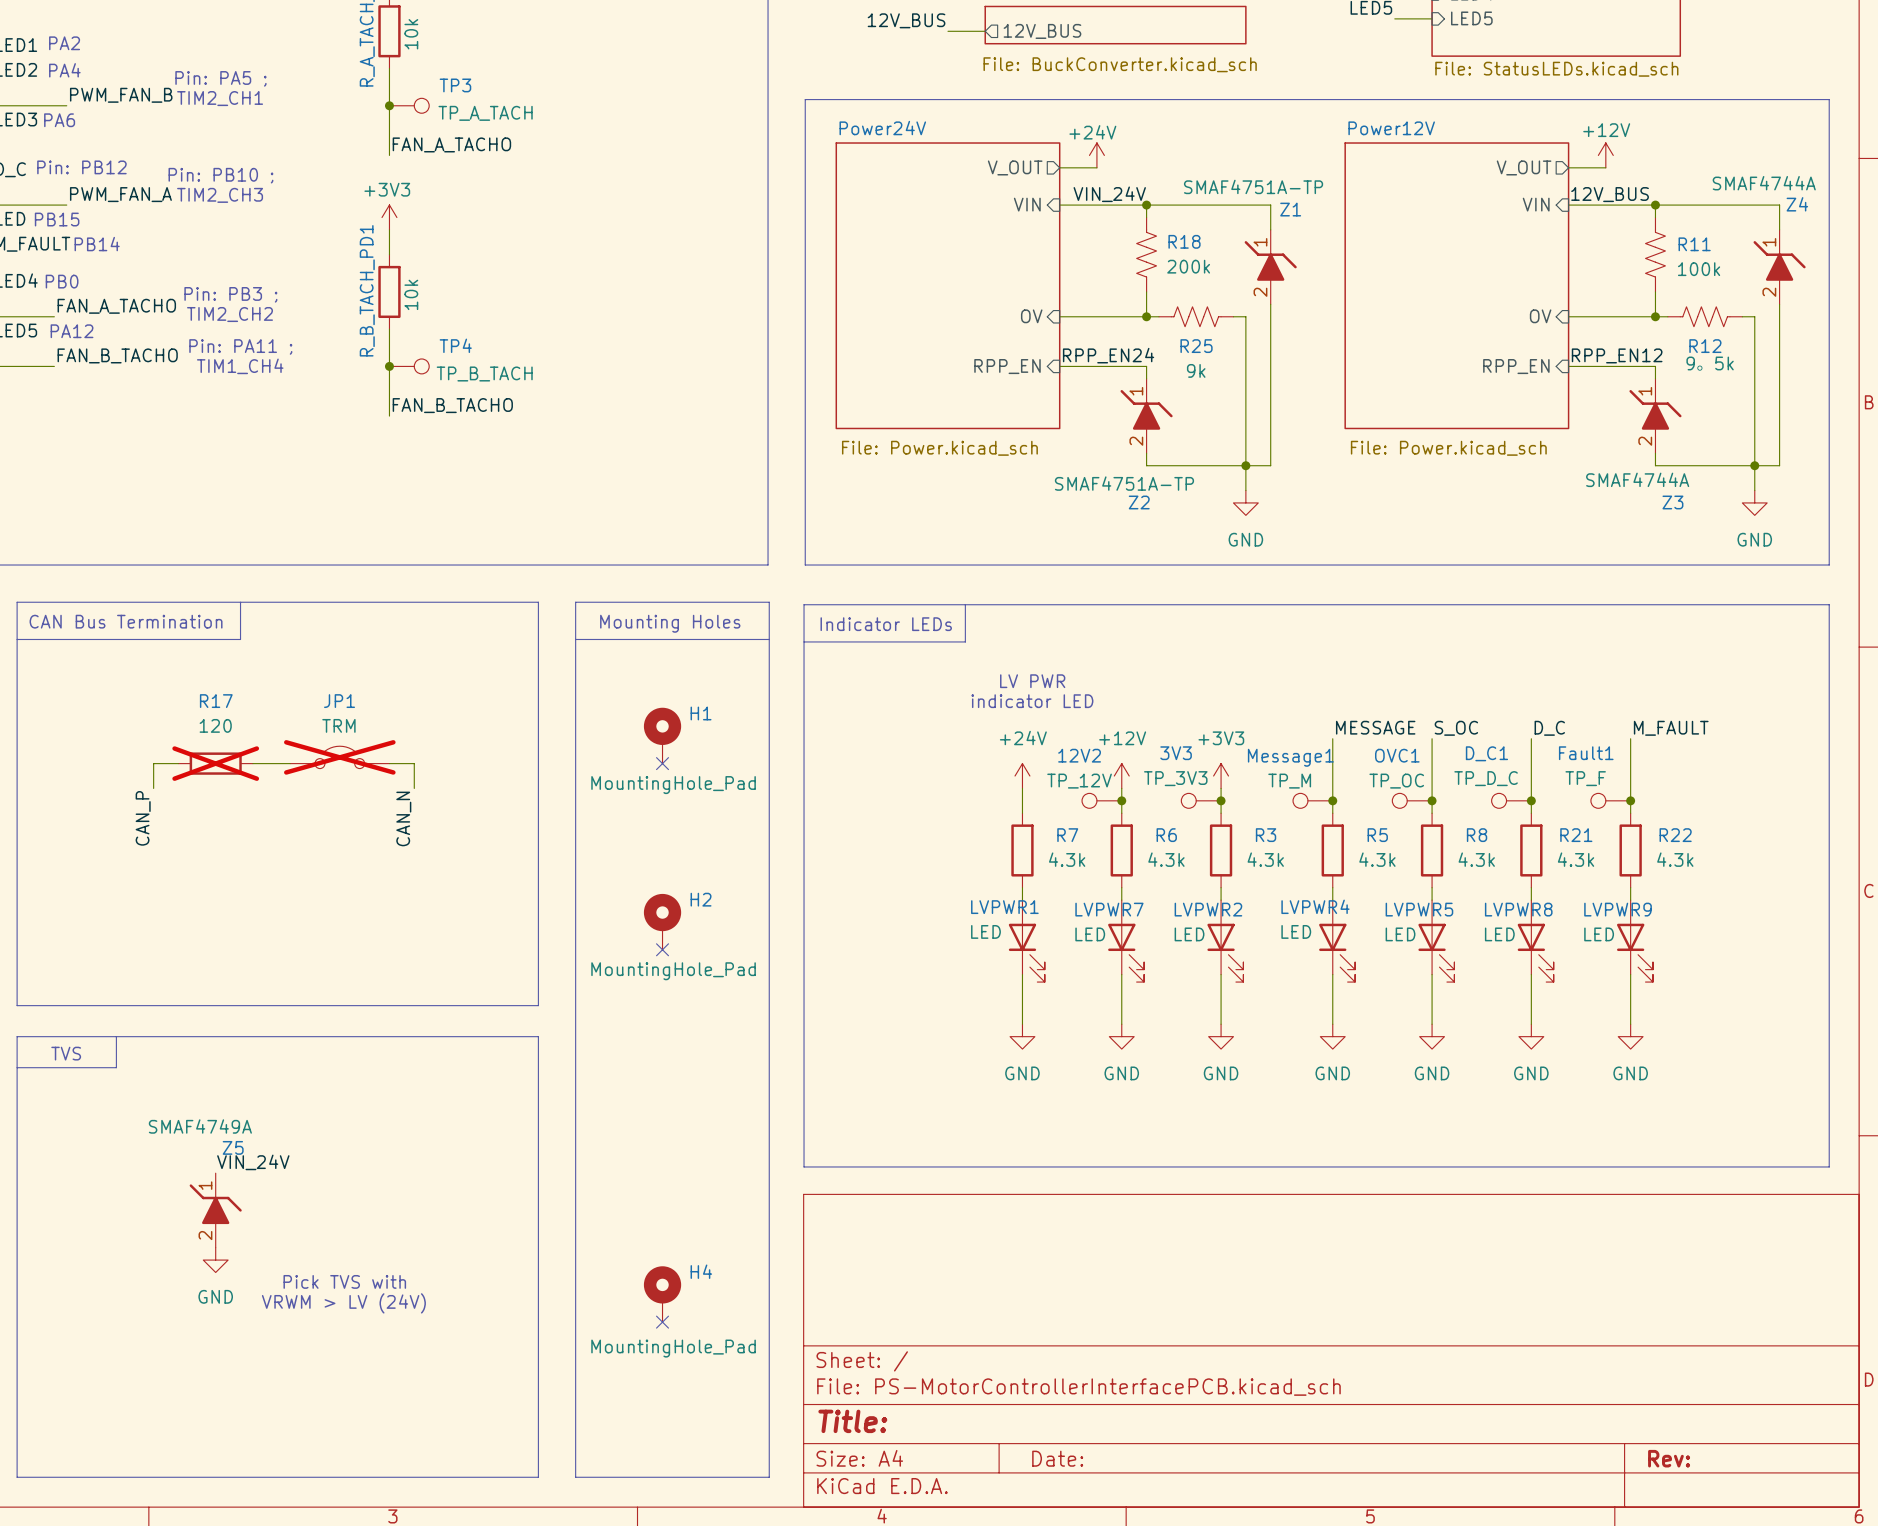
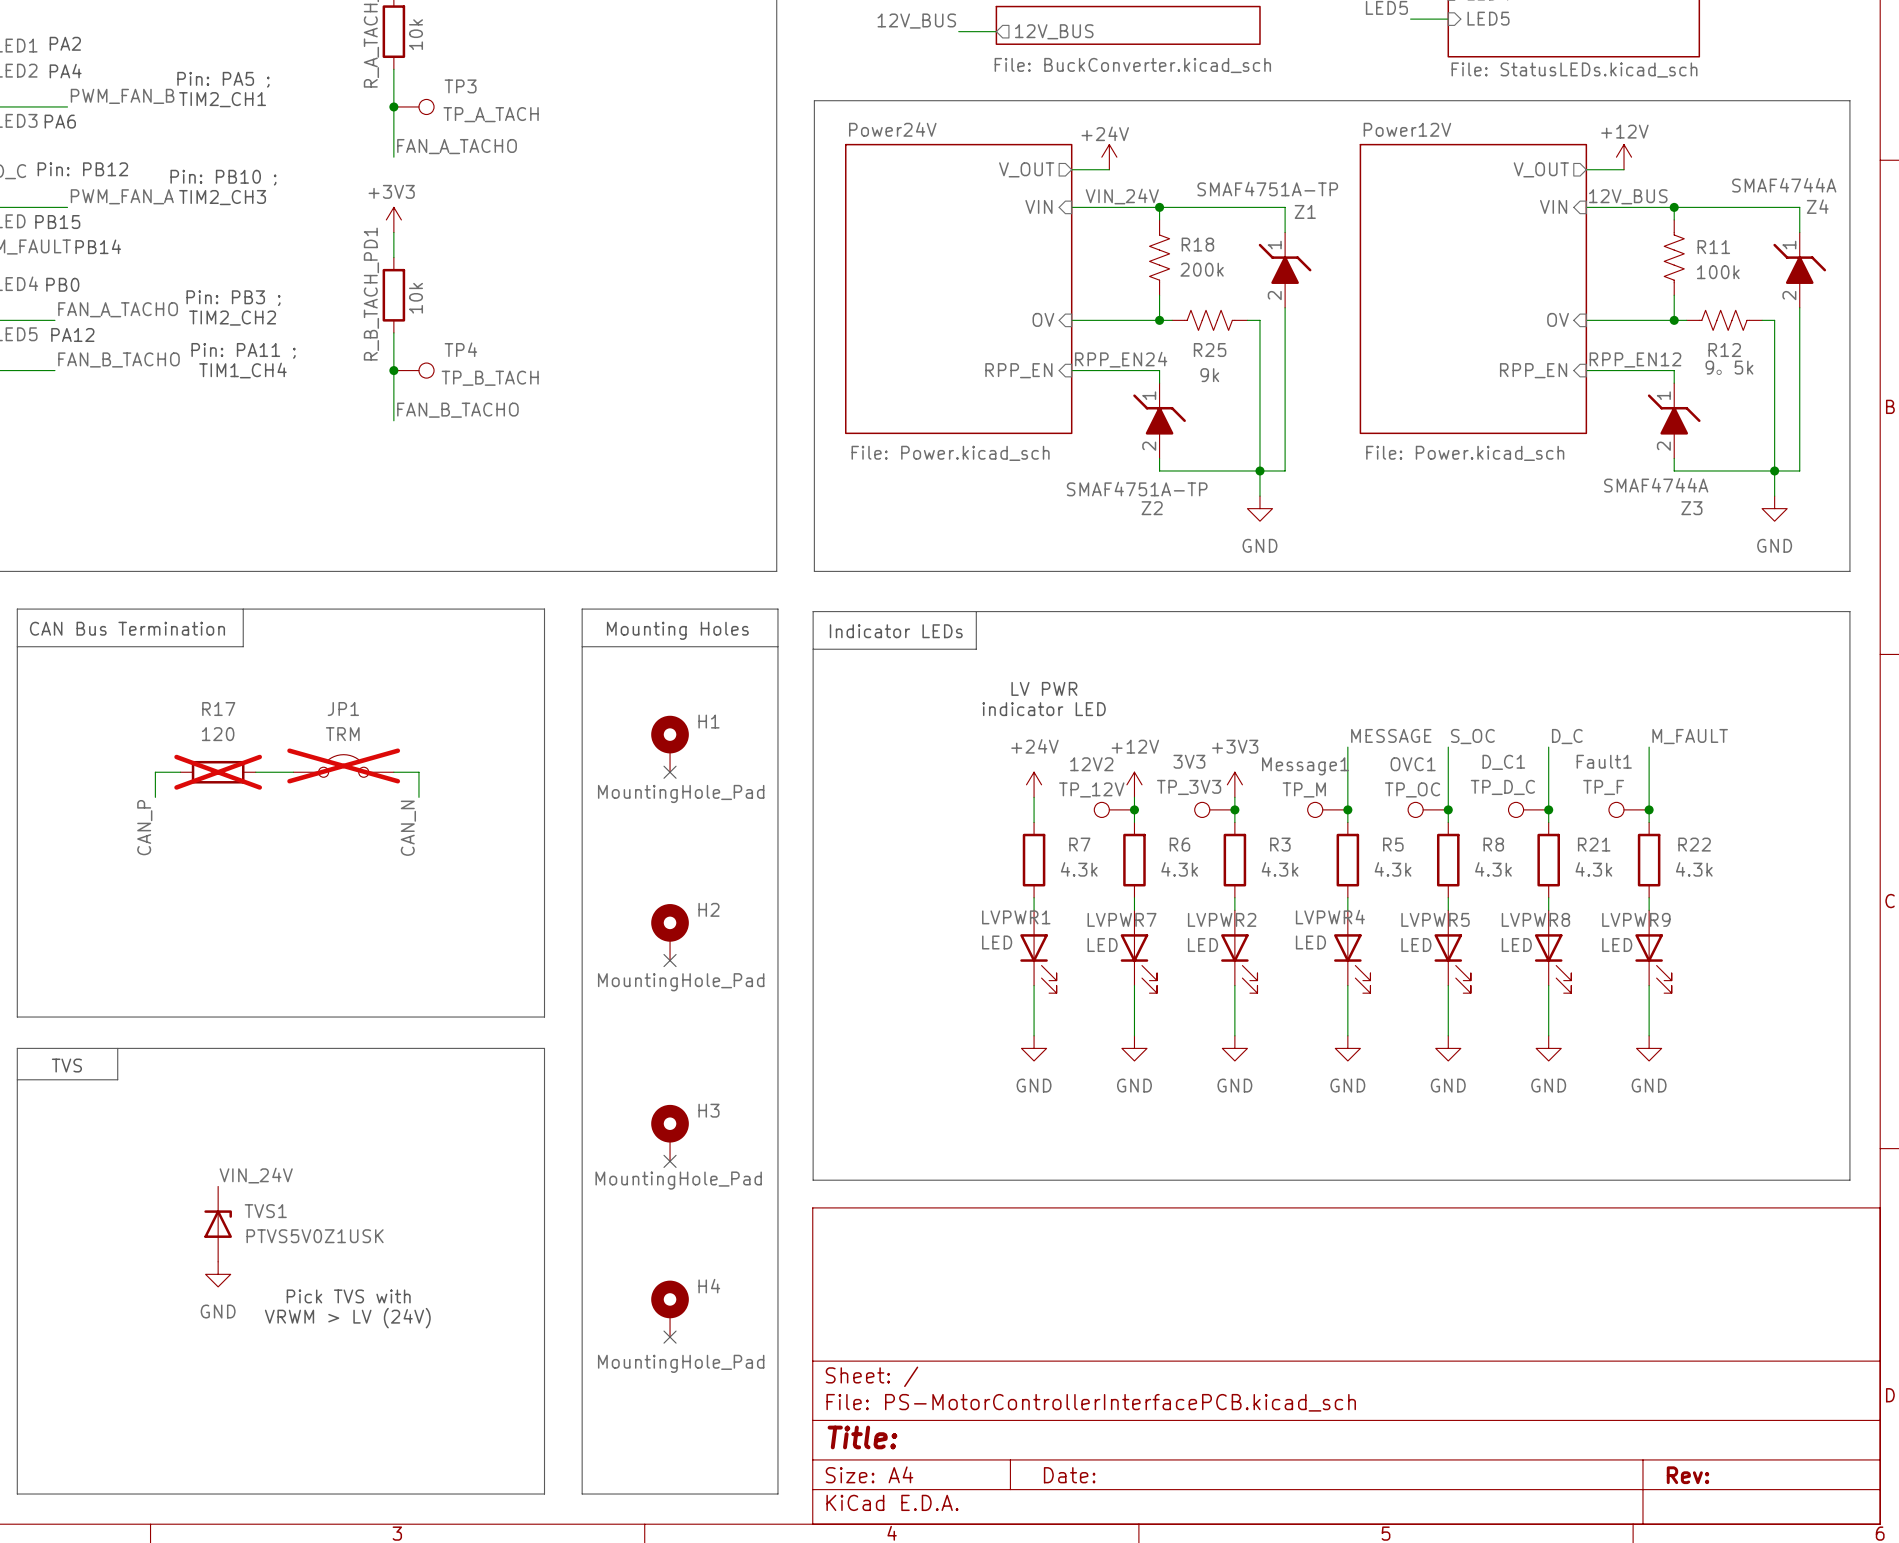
H3: none -> MountingHole_Pad (670, 1133)
no-connect mark: none -> (670, 1161)
Z5: SMAF4749A (215, 1210) -> none
TVS1: none -> PTVS5V0Z1USK (218, 1224)

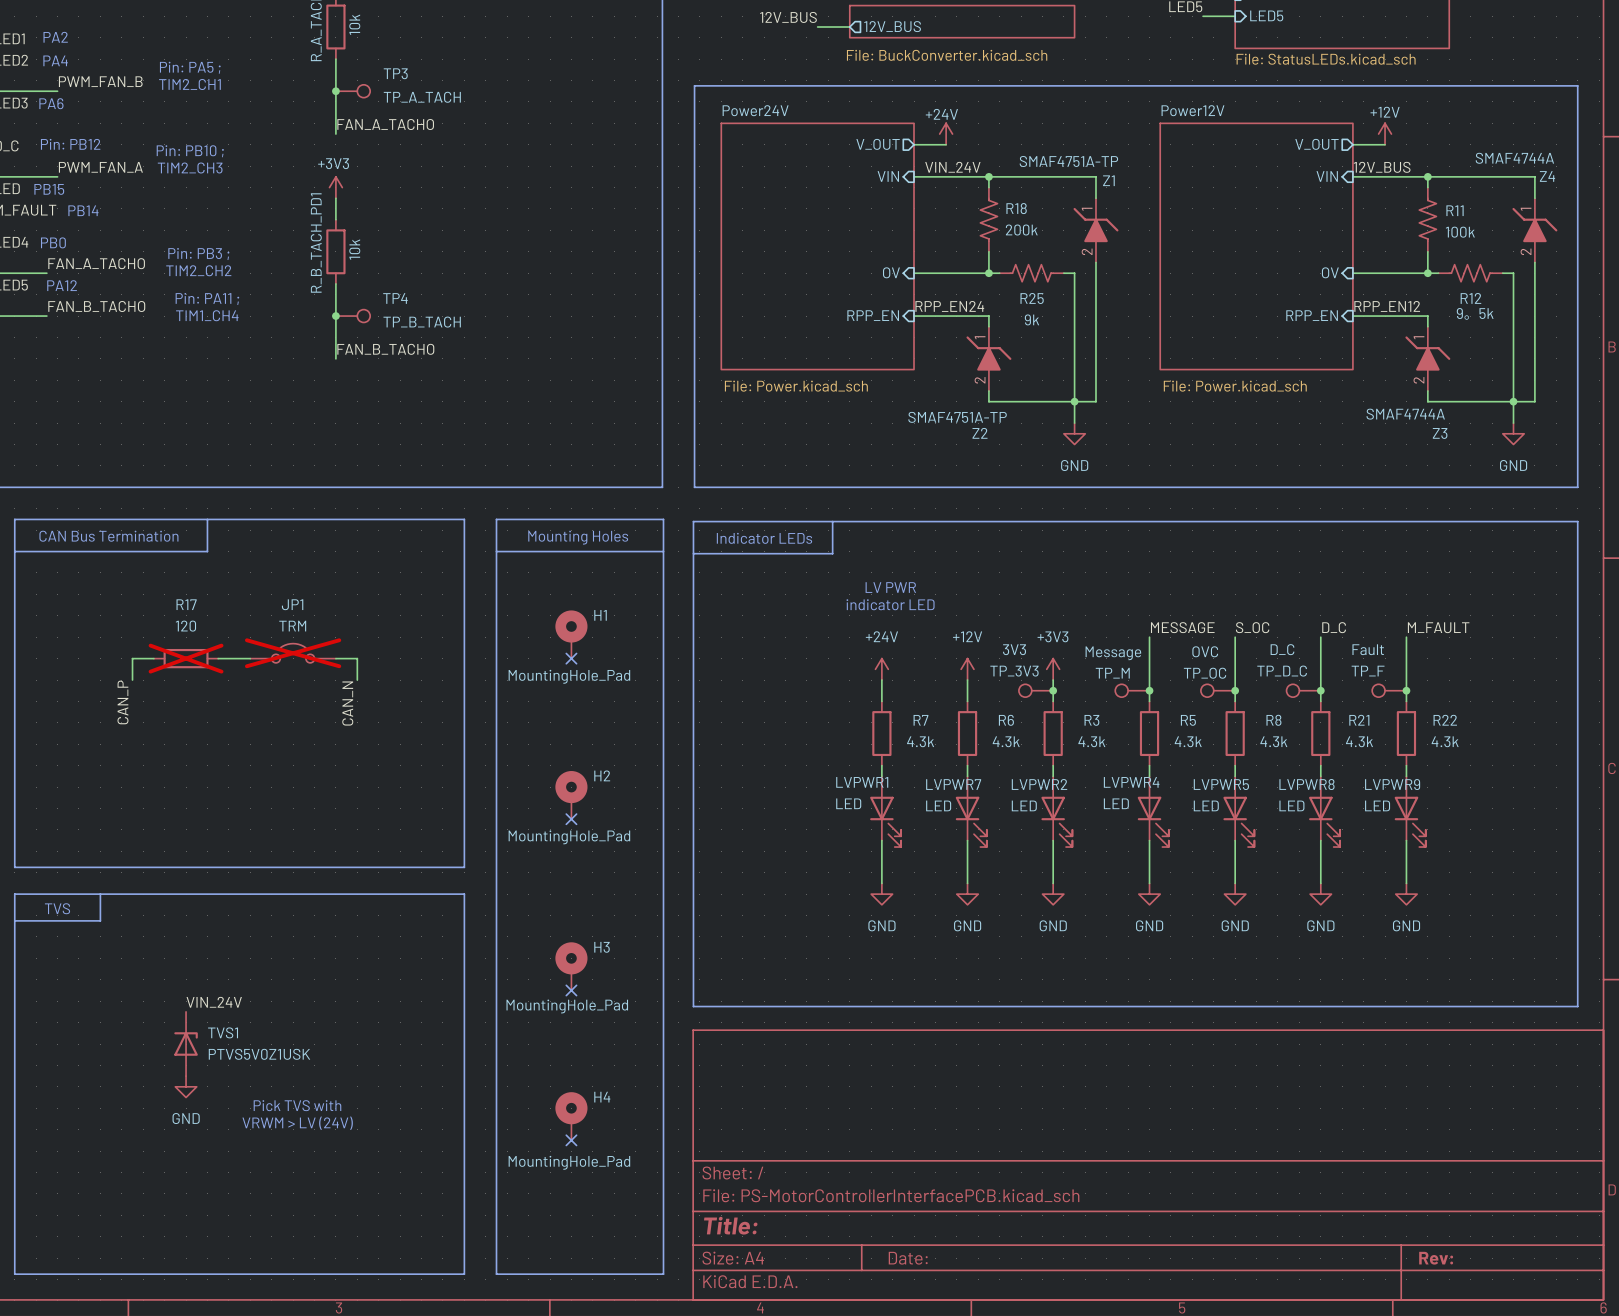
Fault1 name: Fault1 (1604, 761) -> Fault (1368, 649)
D_C1 name: D_C1 (1503, 762) -> D_C (1282, 649)
OVC1 name: OVC1 (1413, 764) -> OVC (1205, 651)
Message1 name: Message1 (1305, 766) -> Message (1113, 653)
12V2: TP_12V (1114, 809) -> none
junction: (1134, 809) -> none

